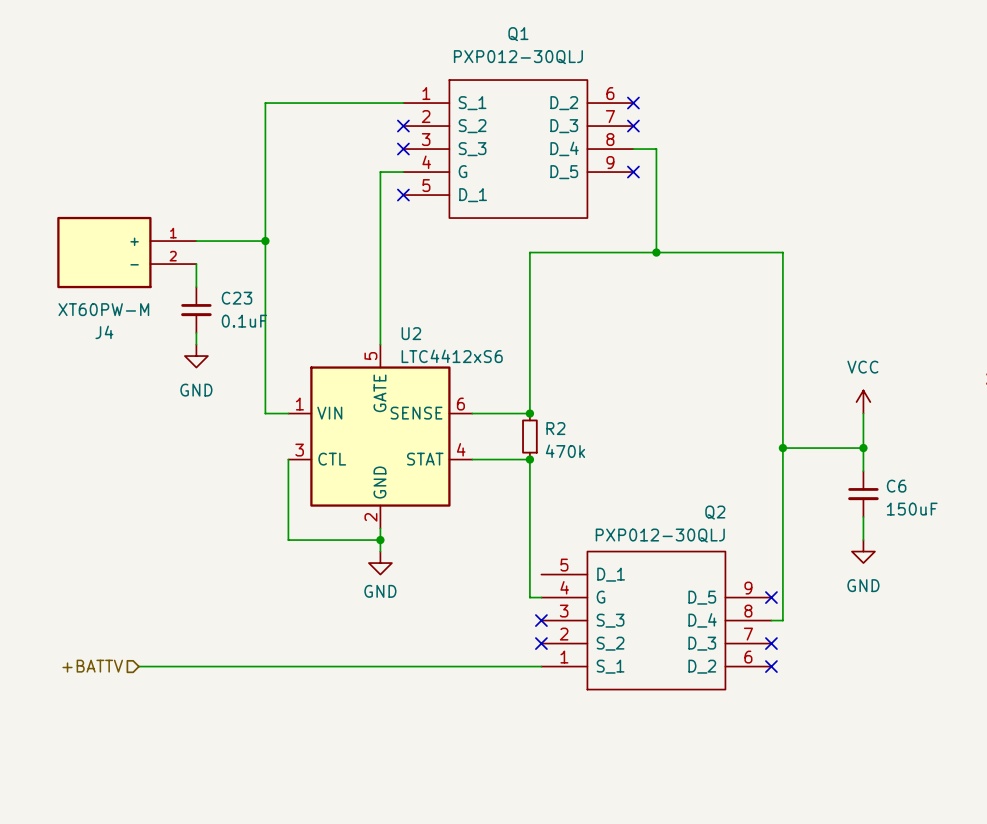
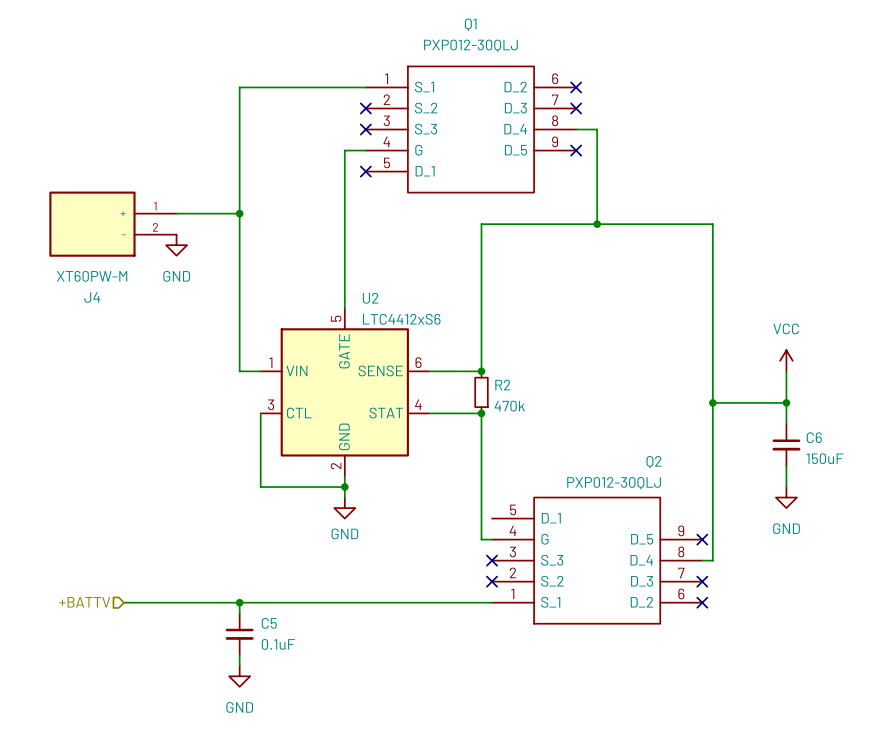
C23: 0.1uF (196, 310) -> none
wire: (196, 333) (196, 344) -> none
power symbol position: GND (196, 356) -> GND (176, 245)
wire: none -> (239, 602) (239, 613)
junction: none -> (239, 602)
C5: none -> 0.1uF (239, 634)
wire: none -> (239, 655) (239, 665)
power symbol: none -> GND (239, 676)

